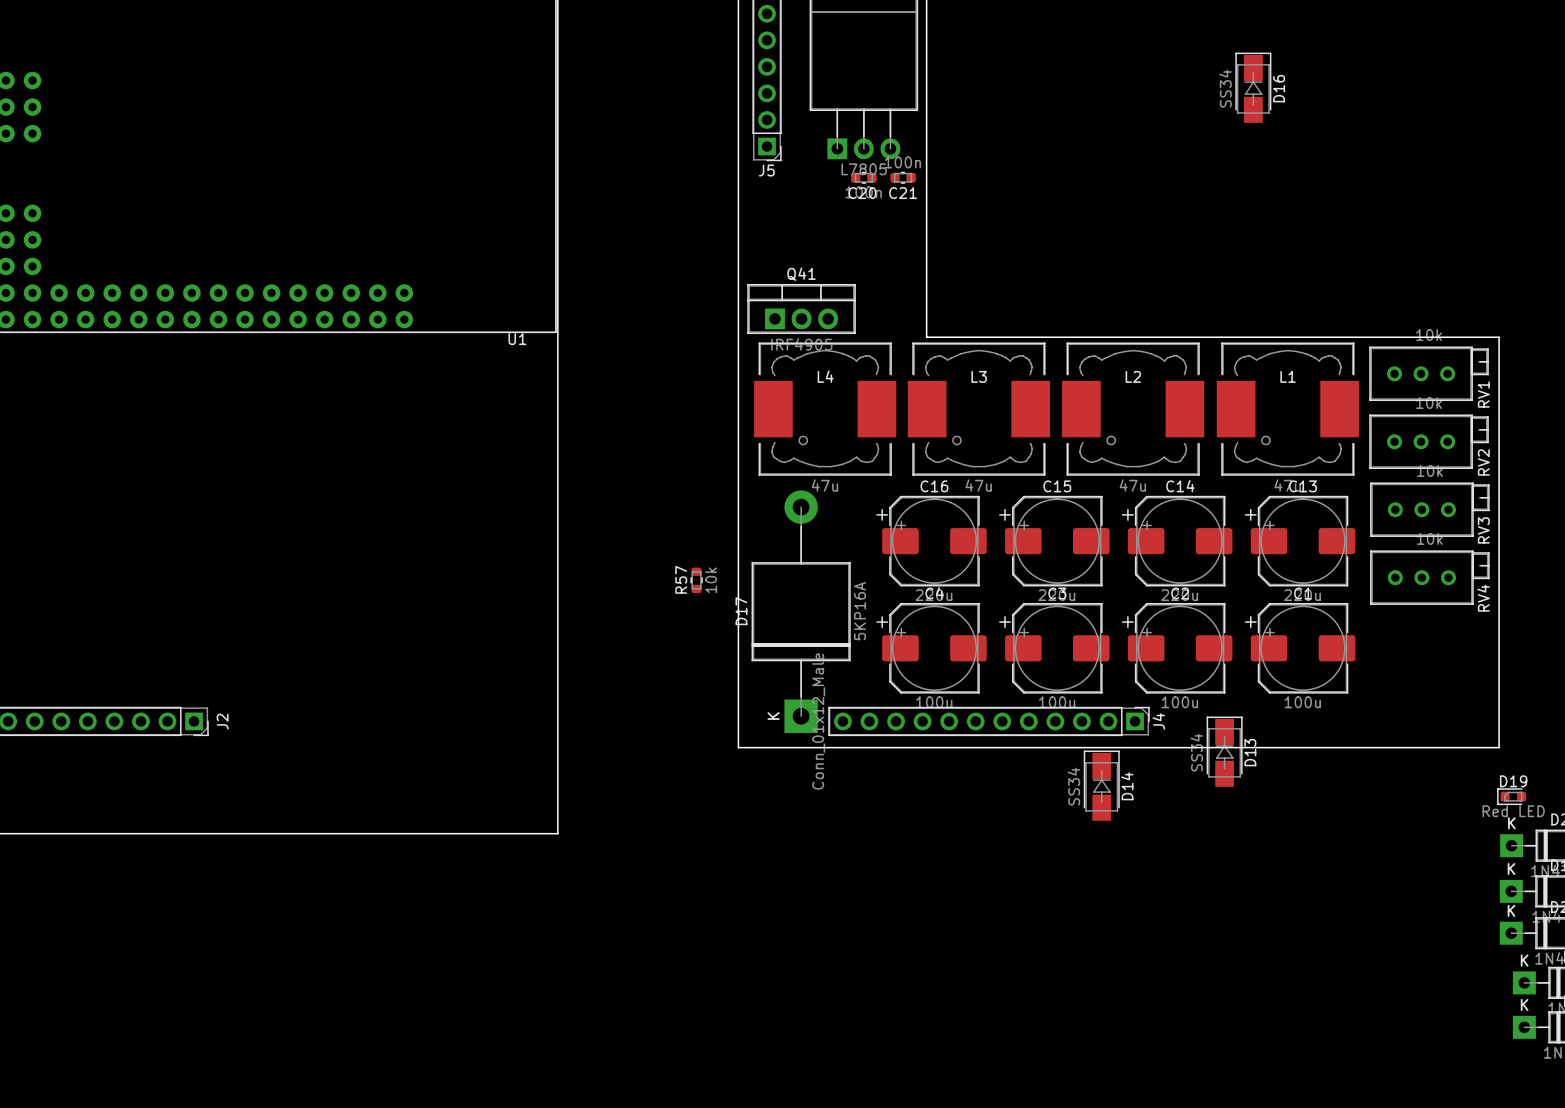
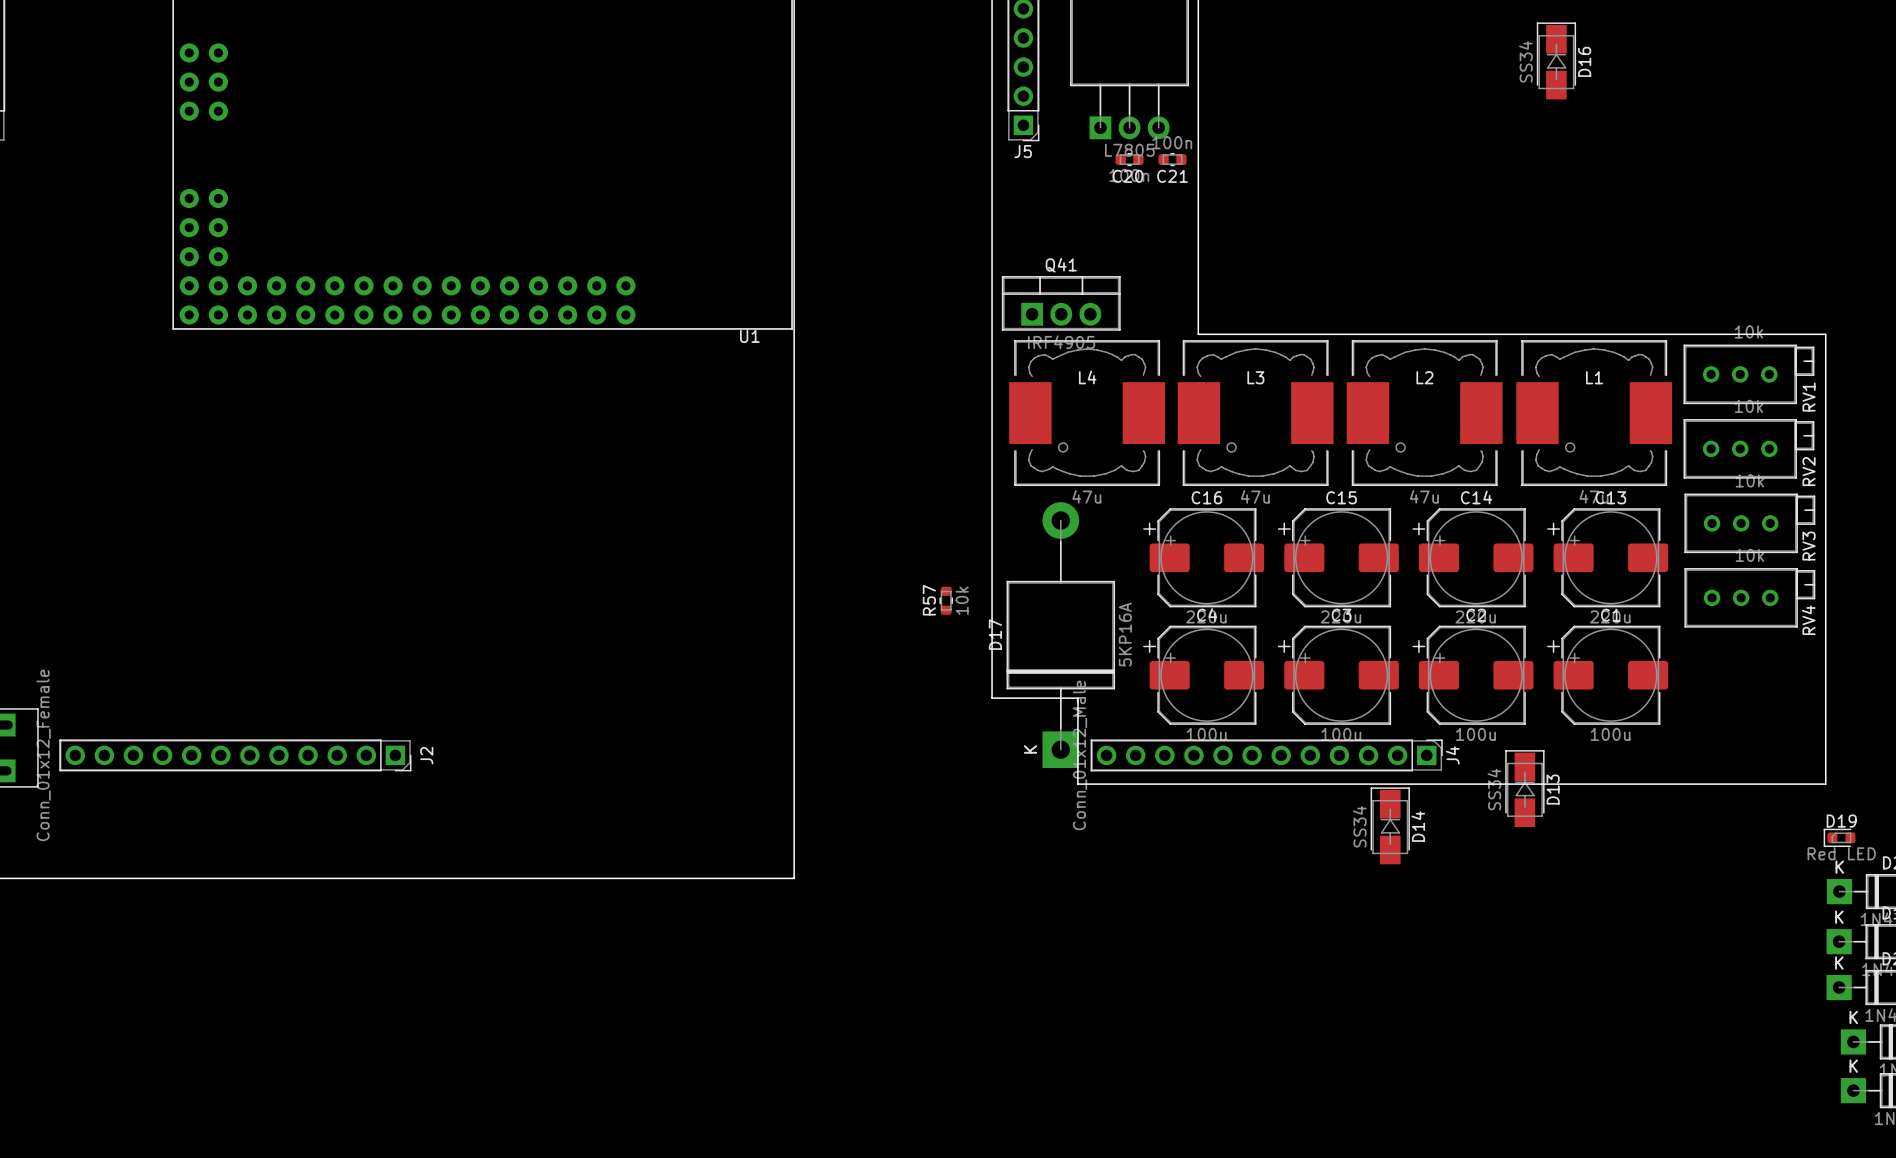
board edge: (738, 669) (738, 747) (816, 747) -> (992, 698) (1077, 698) (1077, 784)

